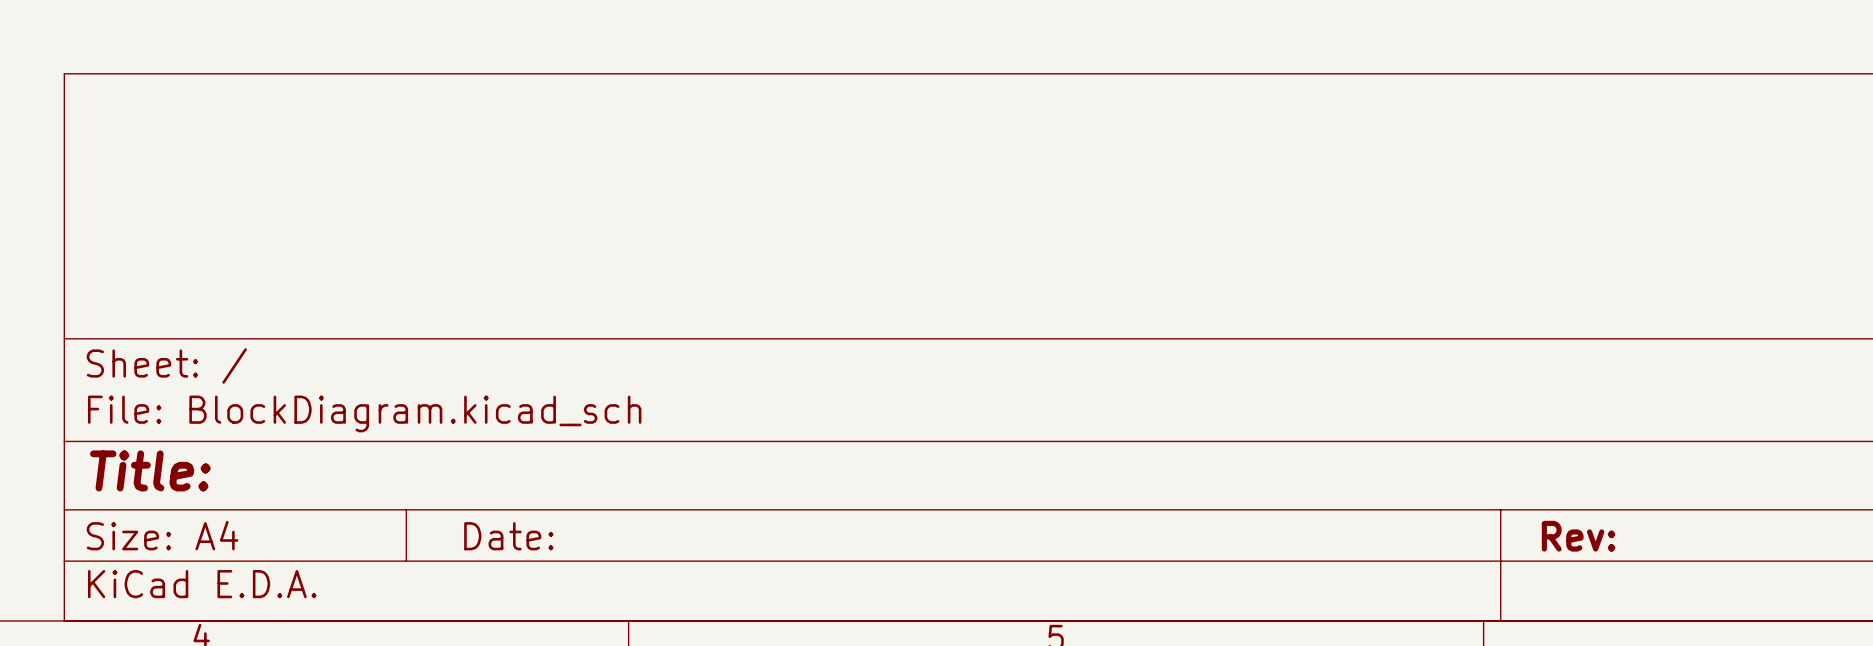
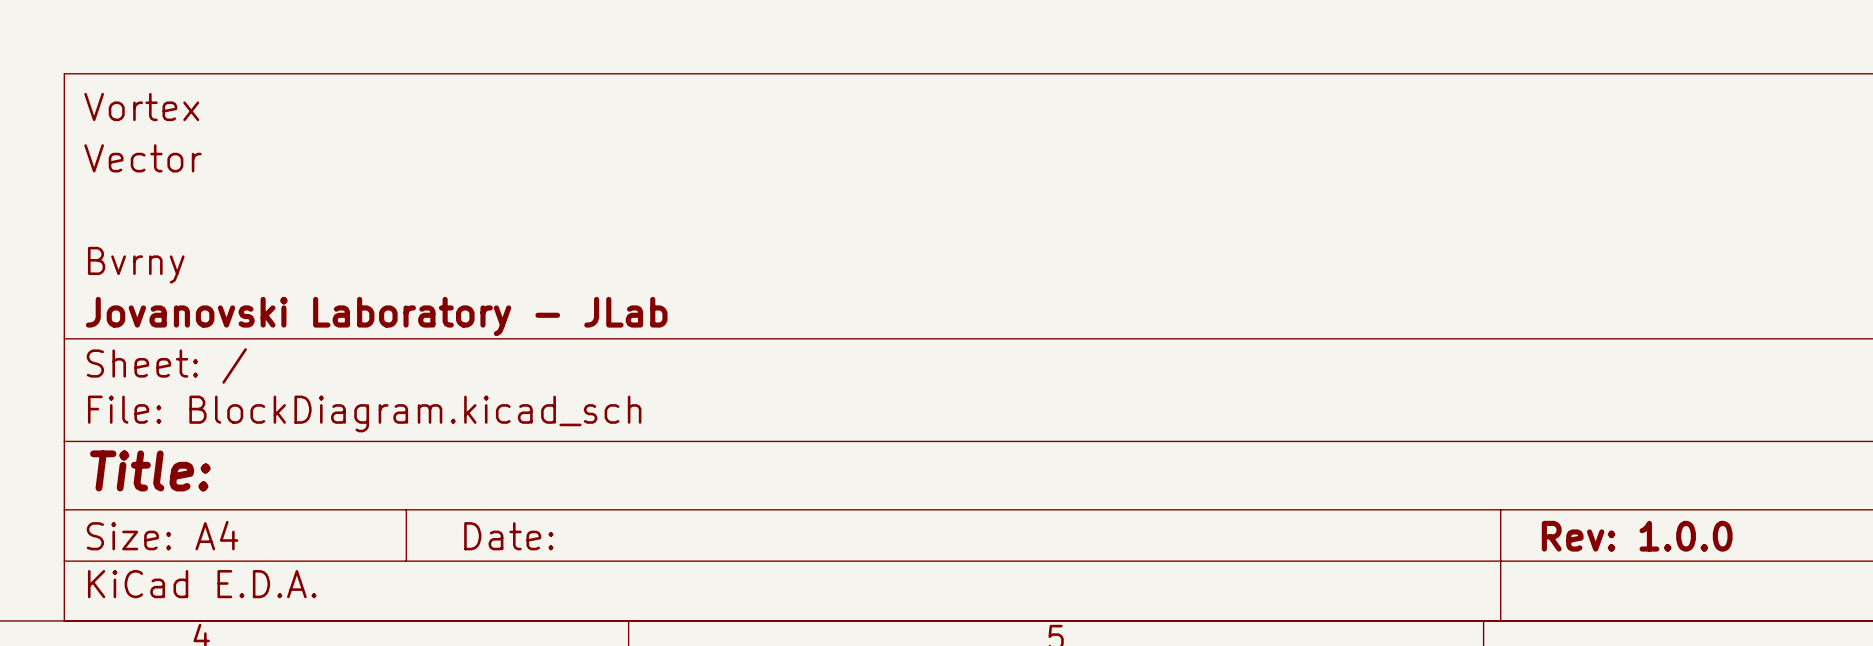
title block: none -> Vortex (141, 107)
title block: none -> Vector (143, 158)
title block: none -> Bvrny (136, 265)
title block: none -> Jovanovski Laboratory - JLab (376, 316)
title block: Rev: (1578, 536) -> Rev: 1.0.0 (1637, 536)

